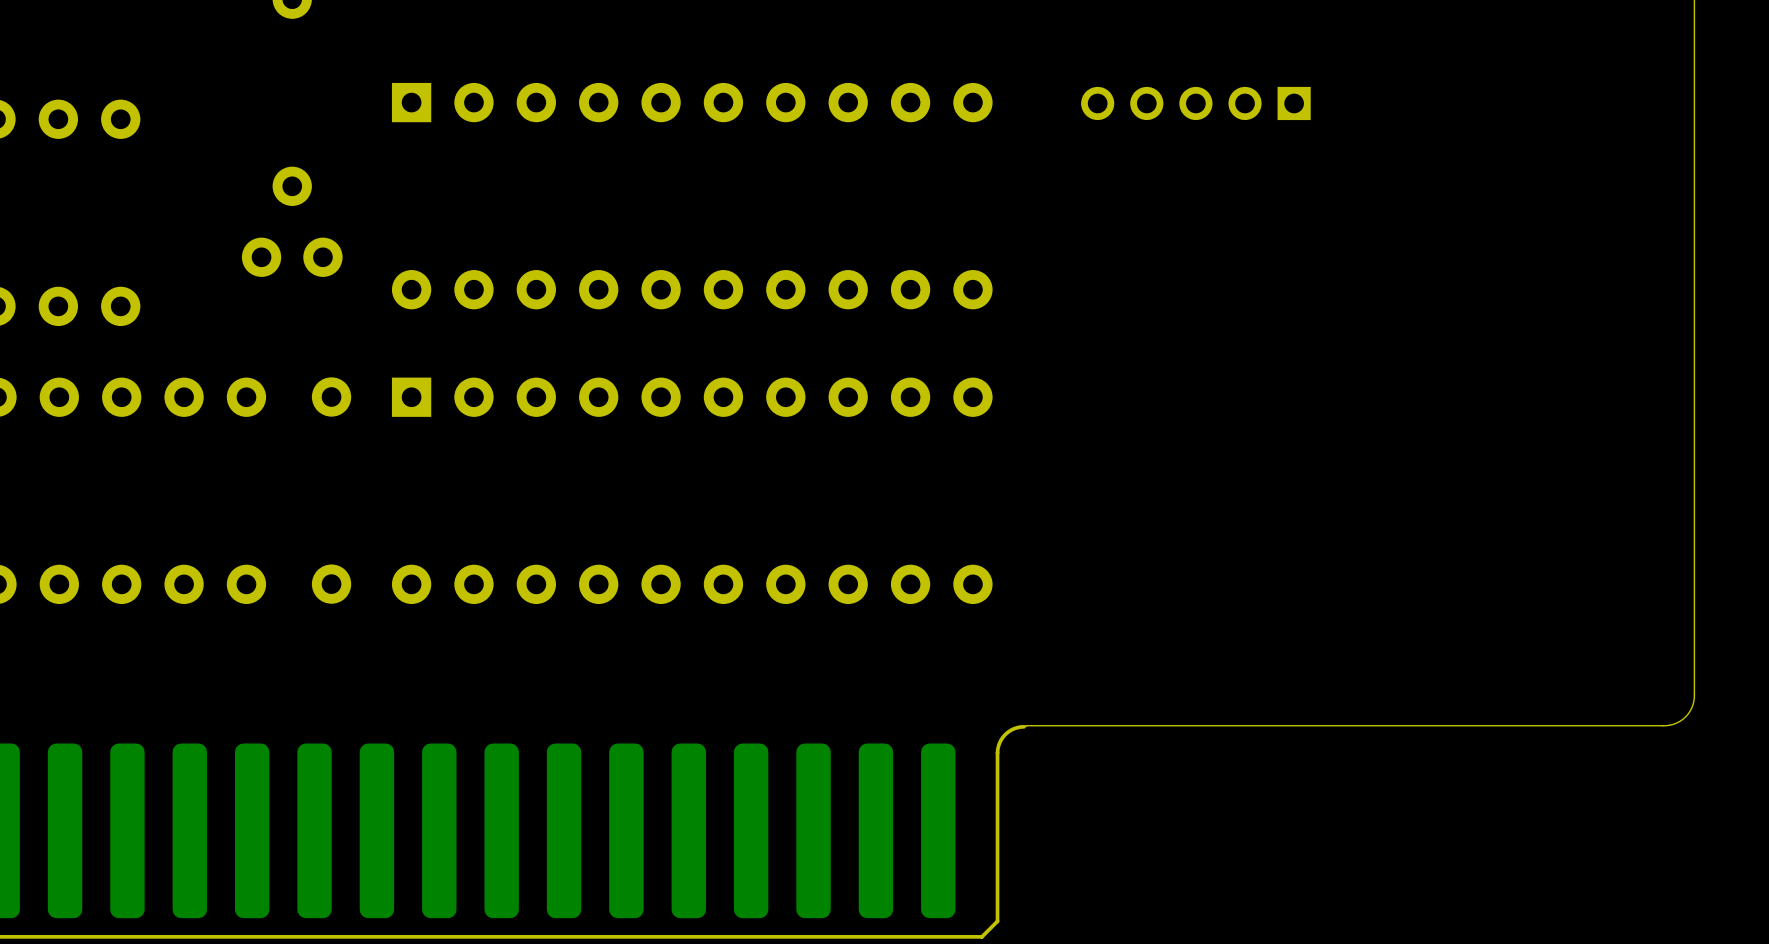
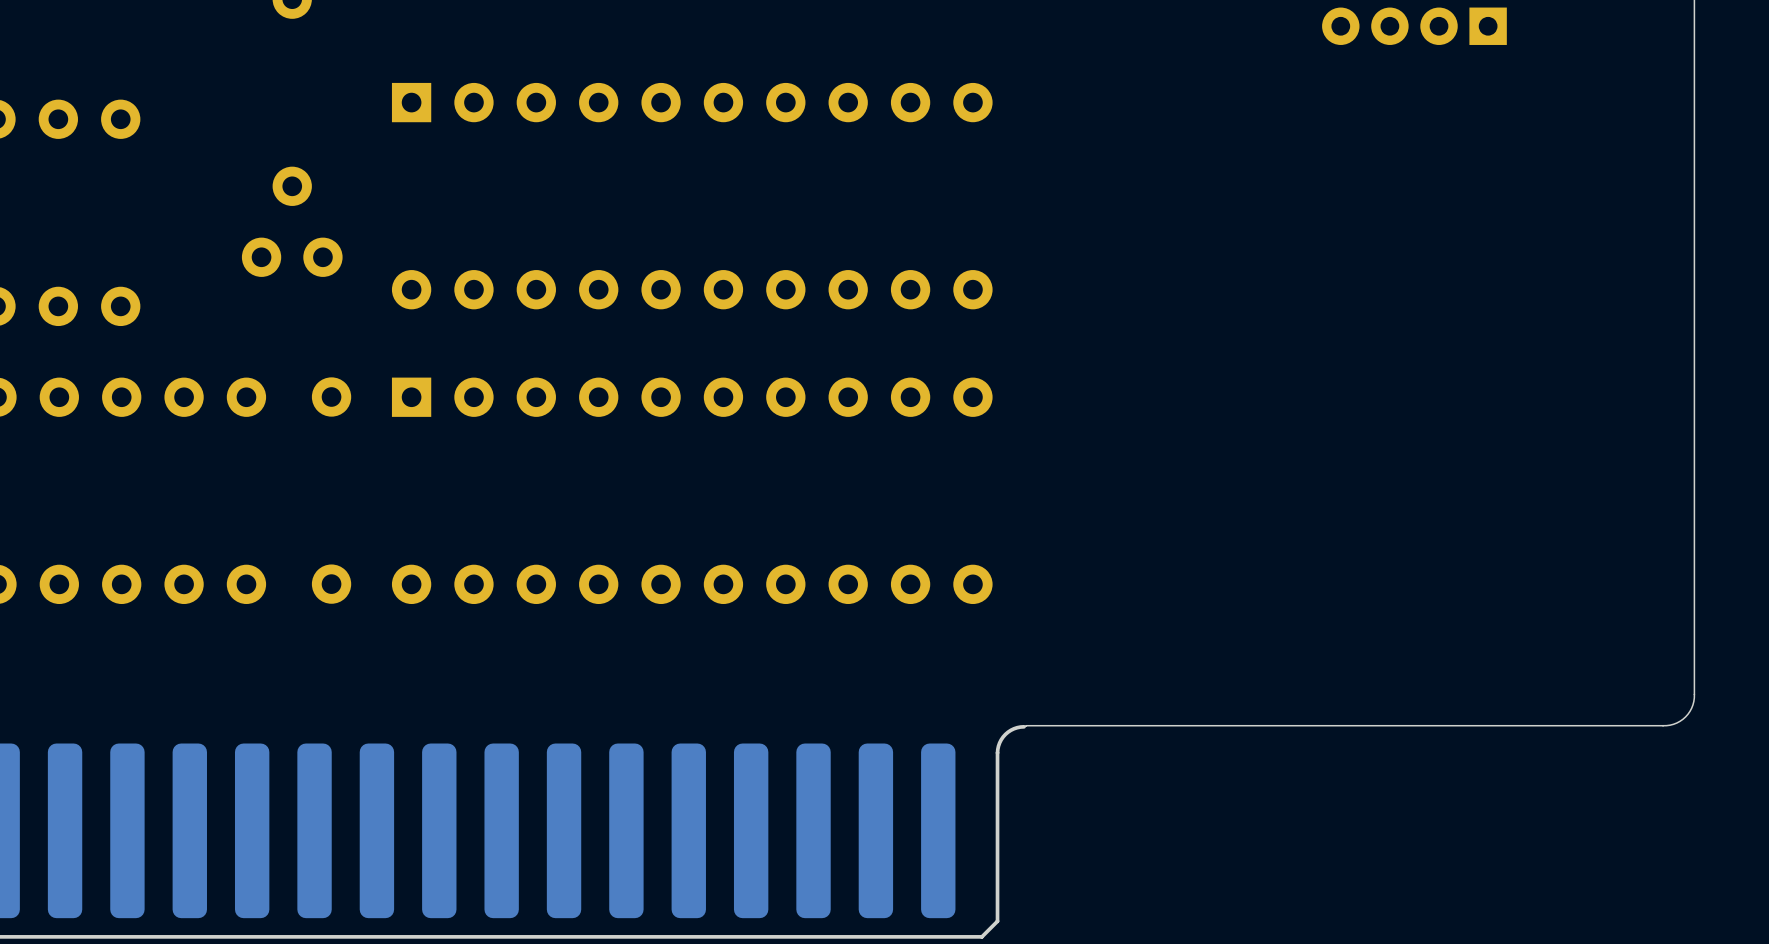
part: none -> (1414, 26)
part: (1195, 103) -> none

